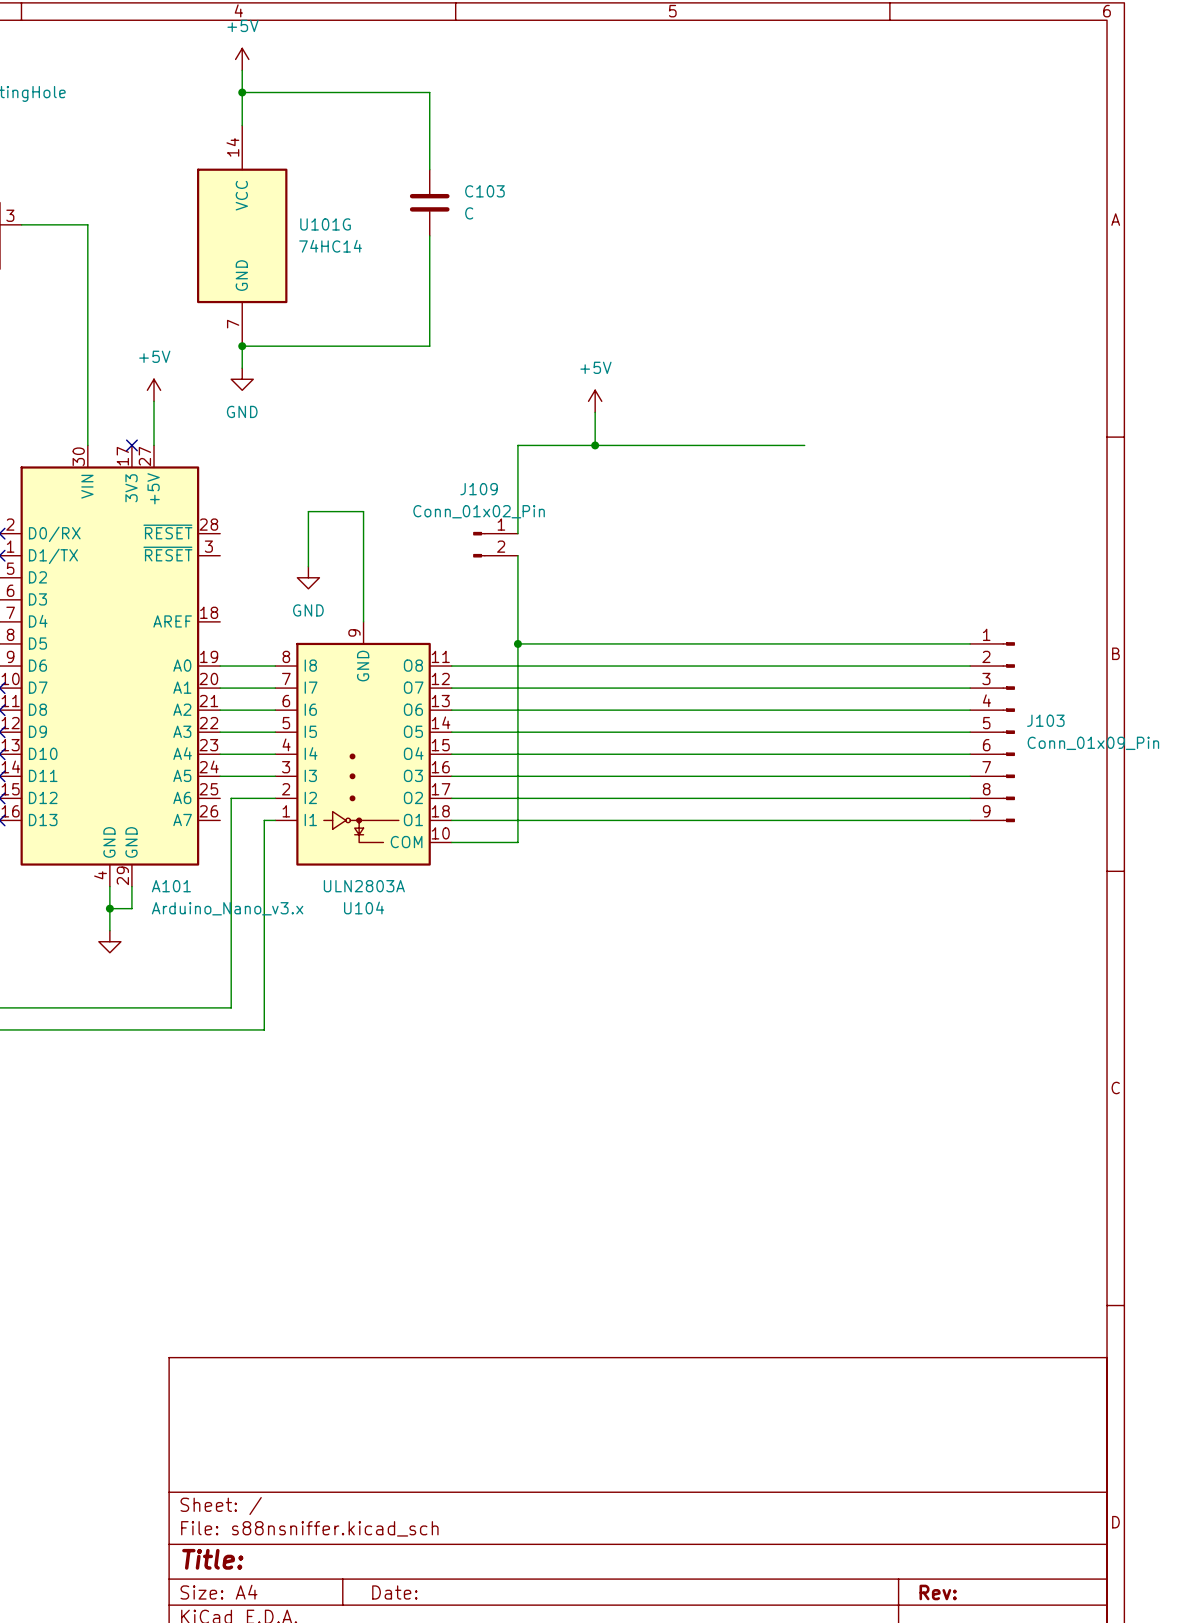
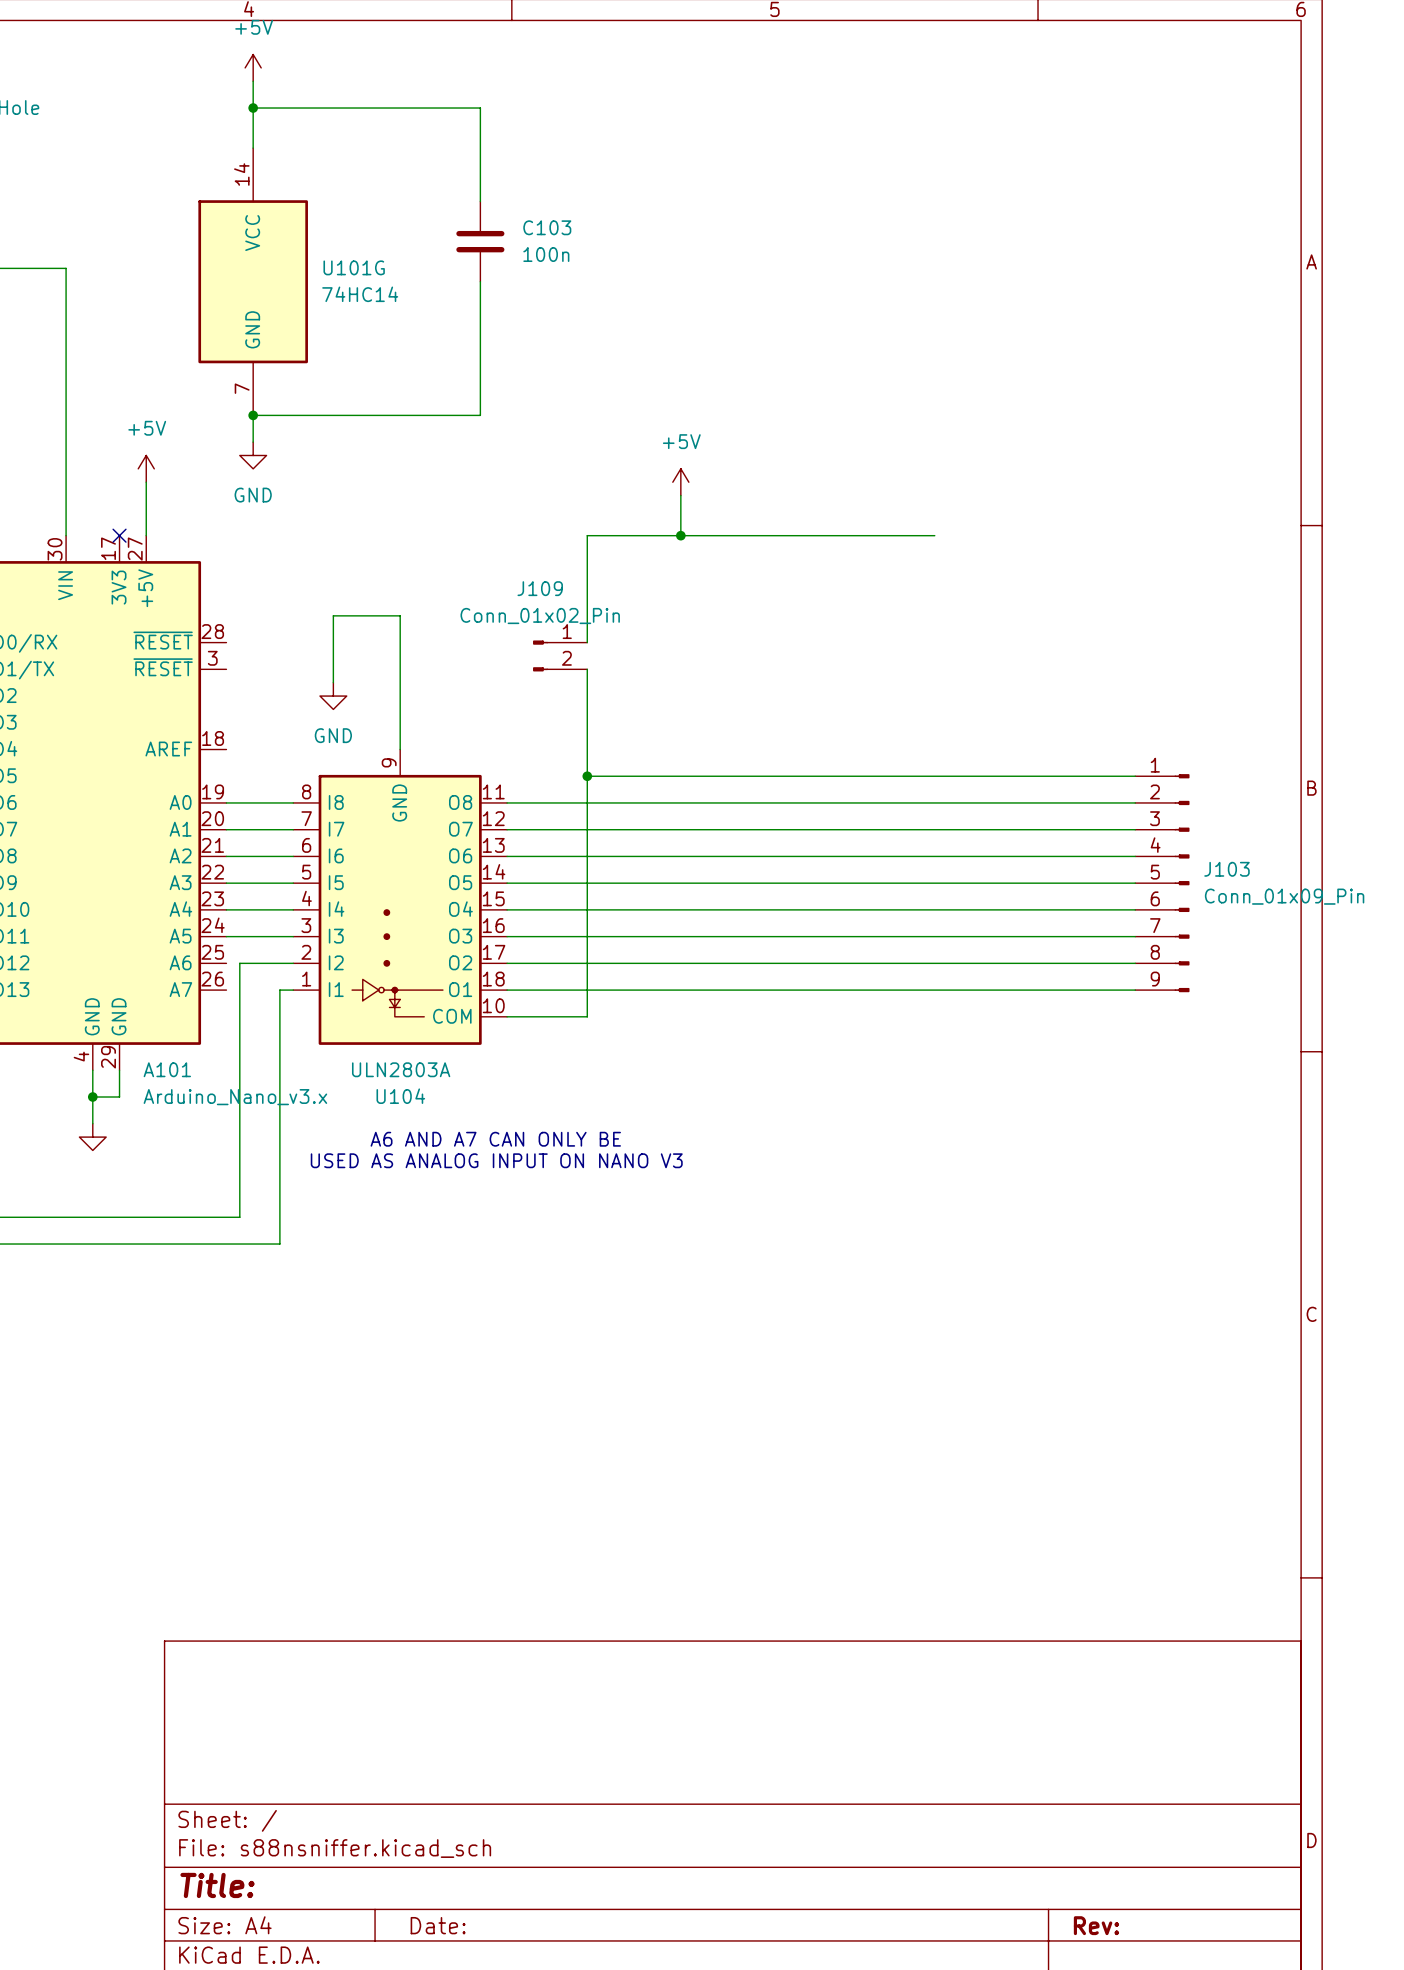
C103 value: C (469, 213) -> 100n (546, 254)
text: none -> A6 AND A7 CAN ONLY BE (495, 1139)
text: none -> USED AS ANALOG INPUT ON NANO V3 (496, 1160)

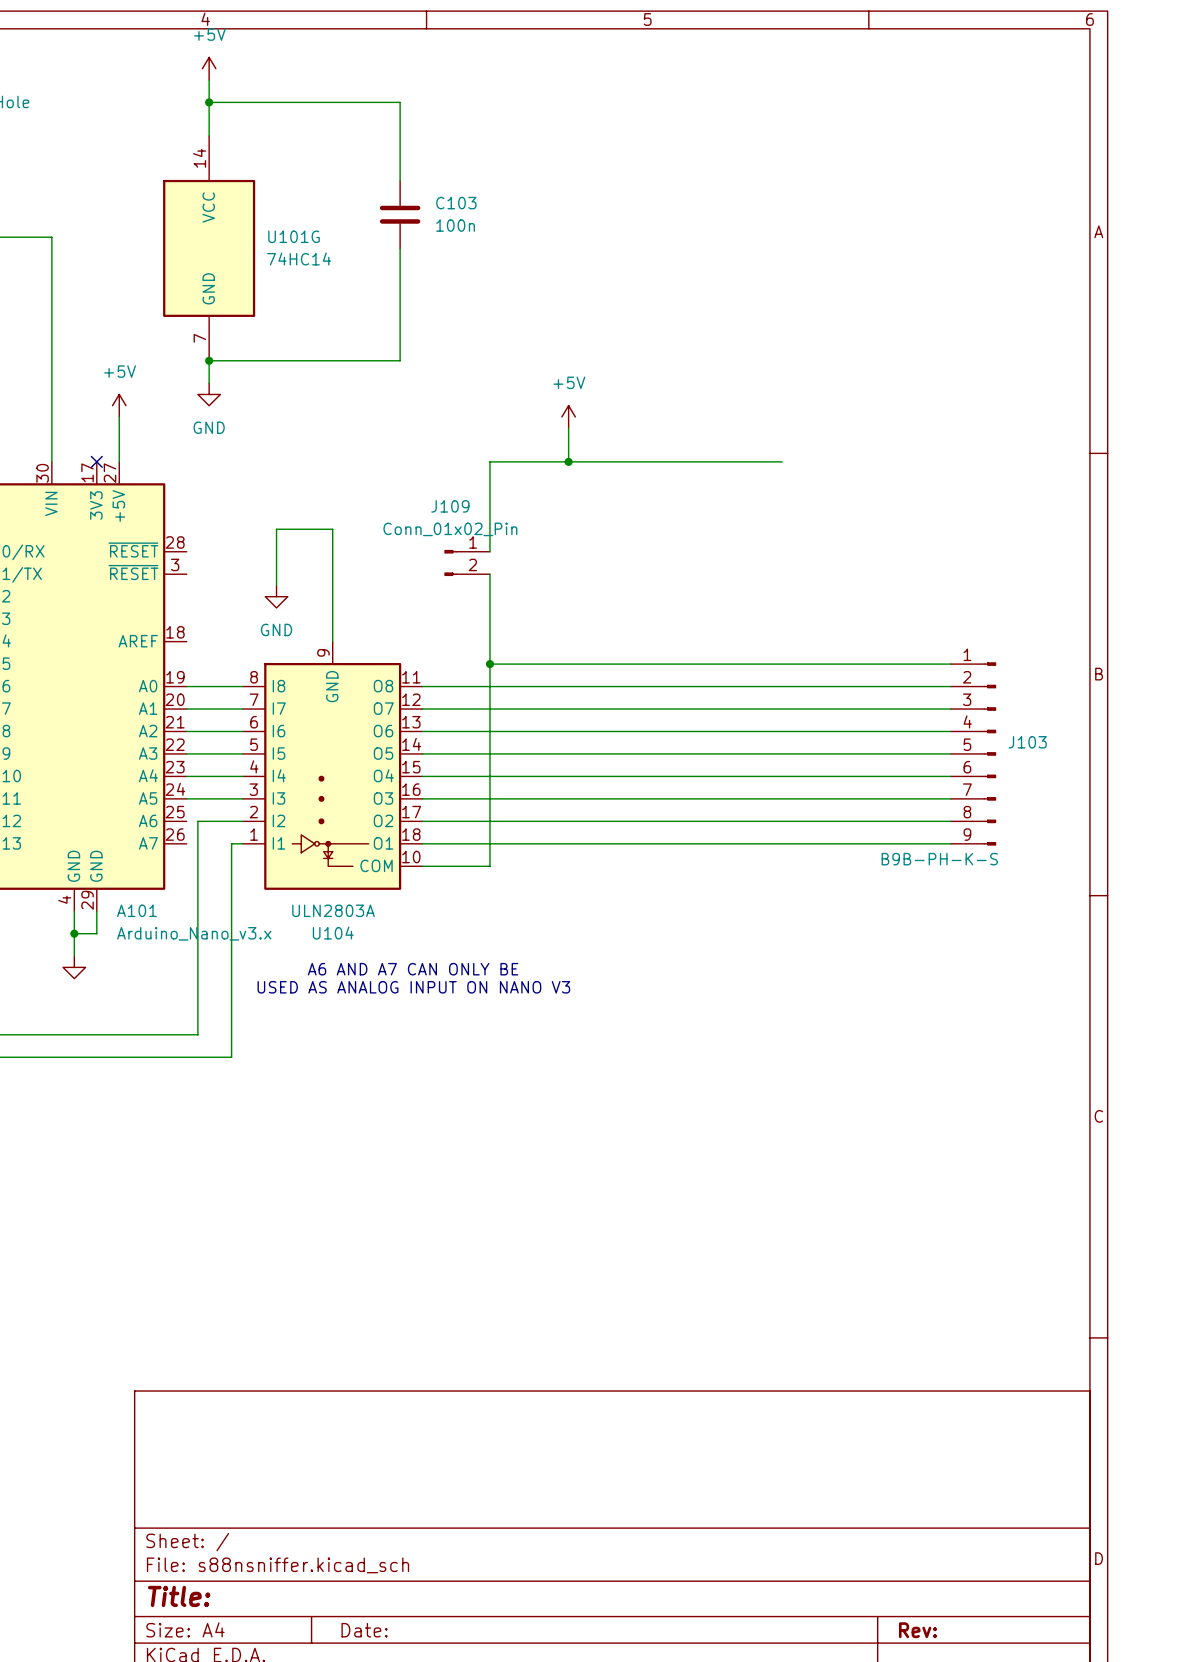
J103 value: Conn_01x09_Pin (1284, 896) -> B9B-PH-K-S (939, 859)

